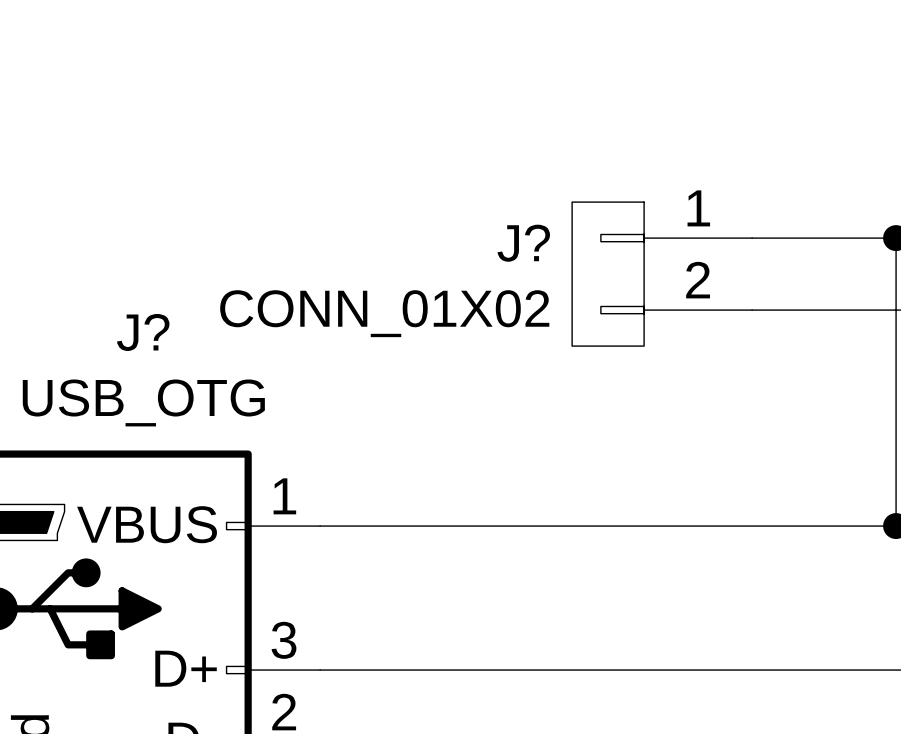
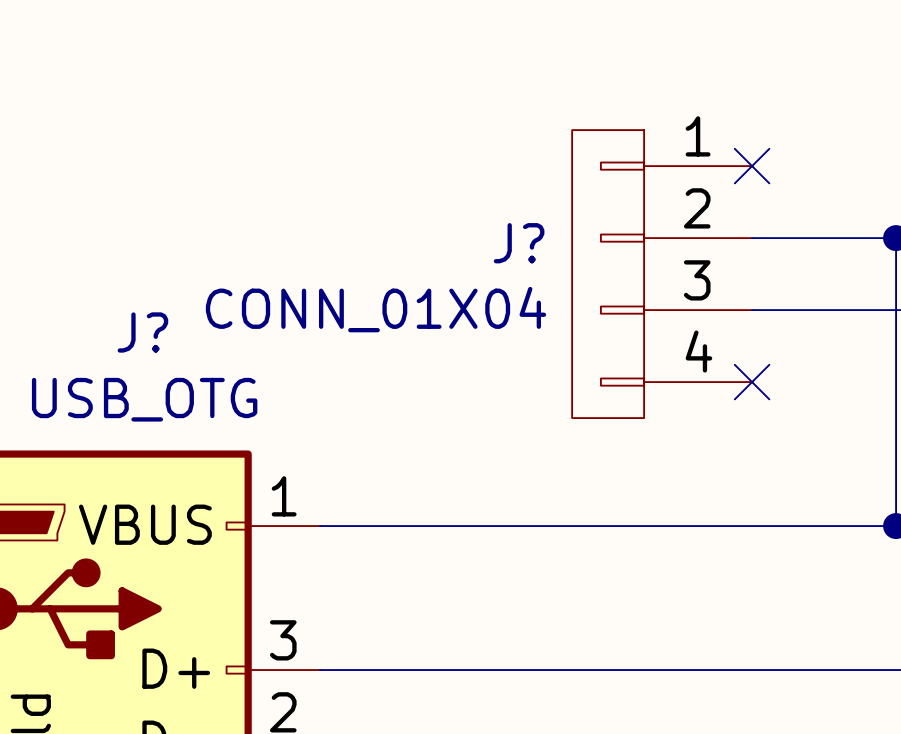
no-connect mark: none -> (752, 166)
J? symbol: [572, 202, 753, 347] -> [572, 130, 753, 419]
J? value: CONN_01X02 (384, 313) -> CONN_01X04 (375, 309)
no-connect mark: none -> (752, 382)

